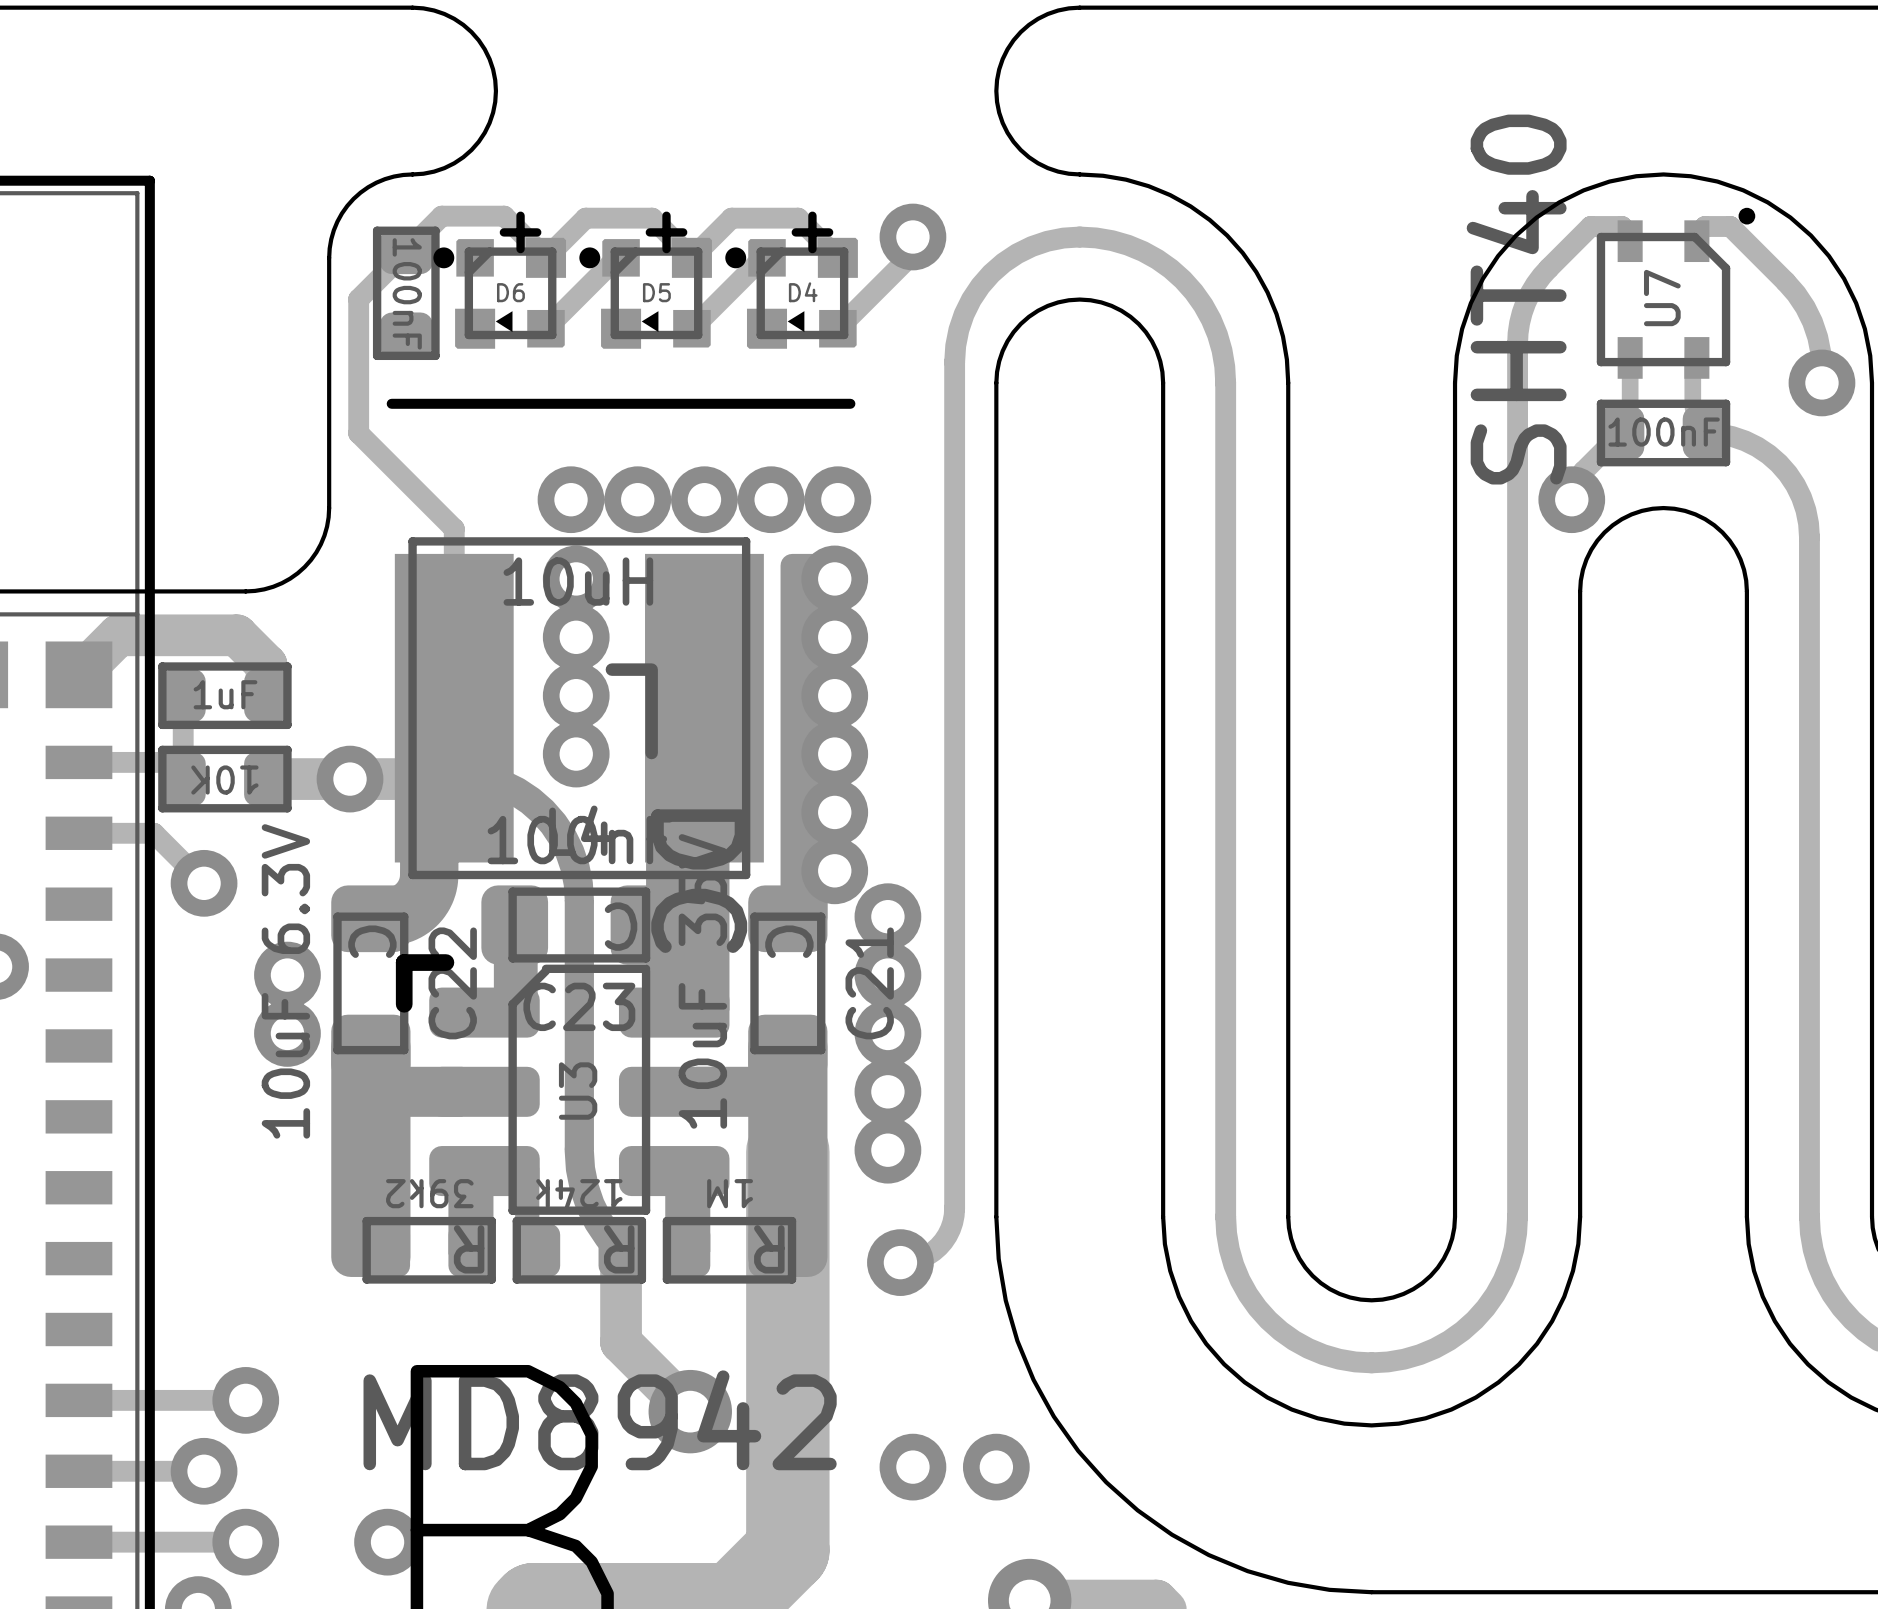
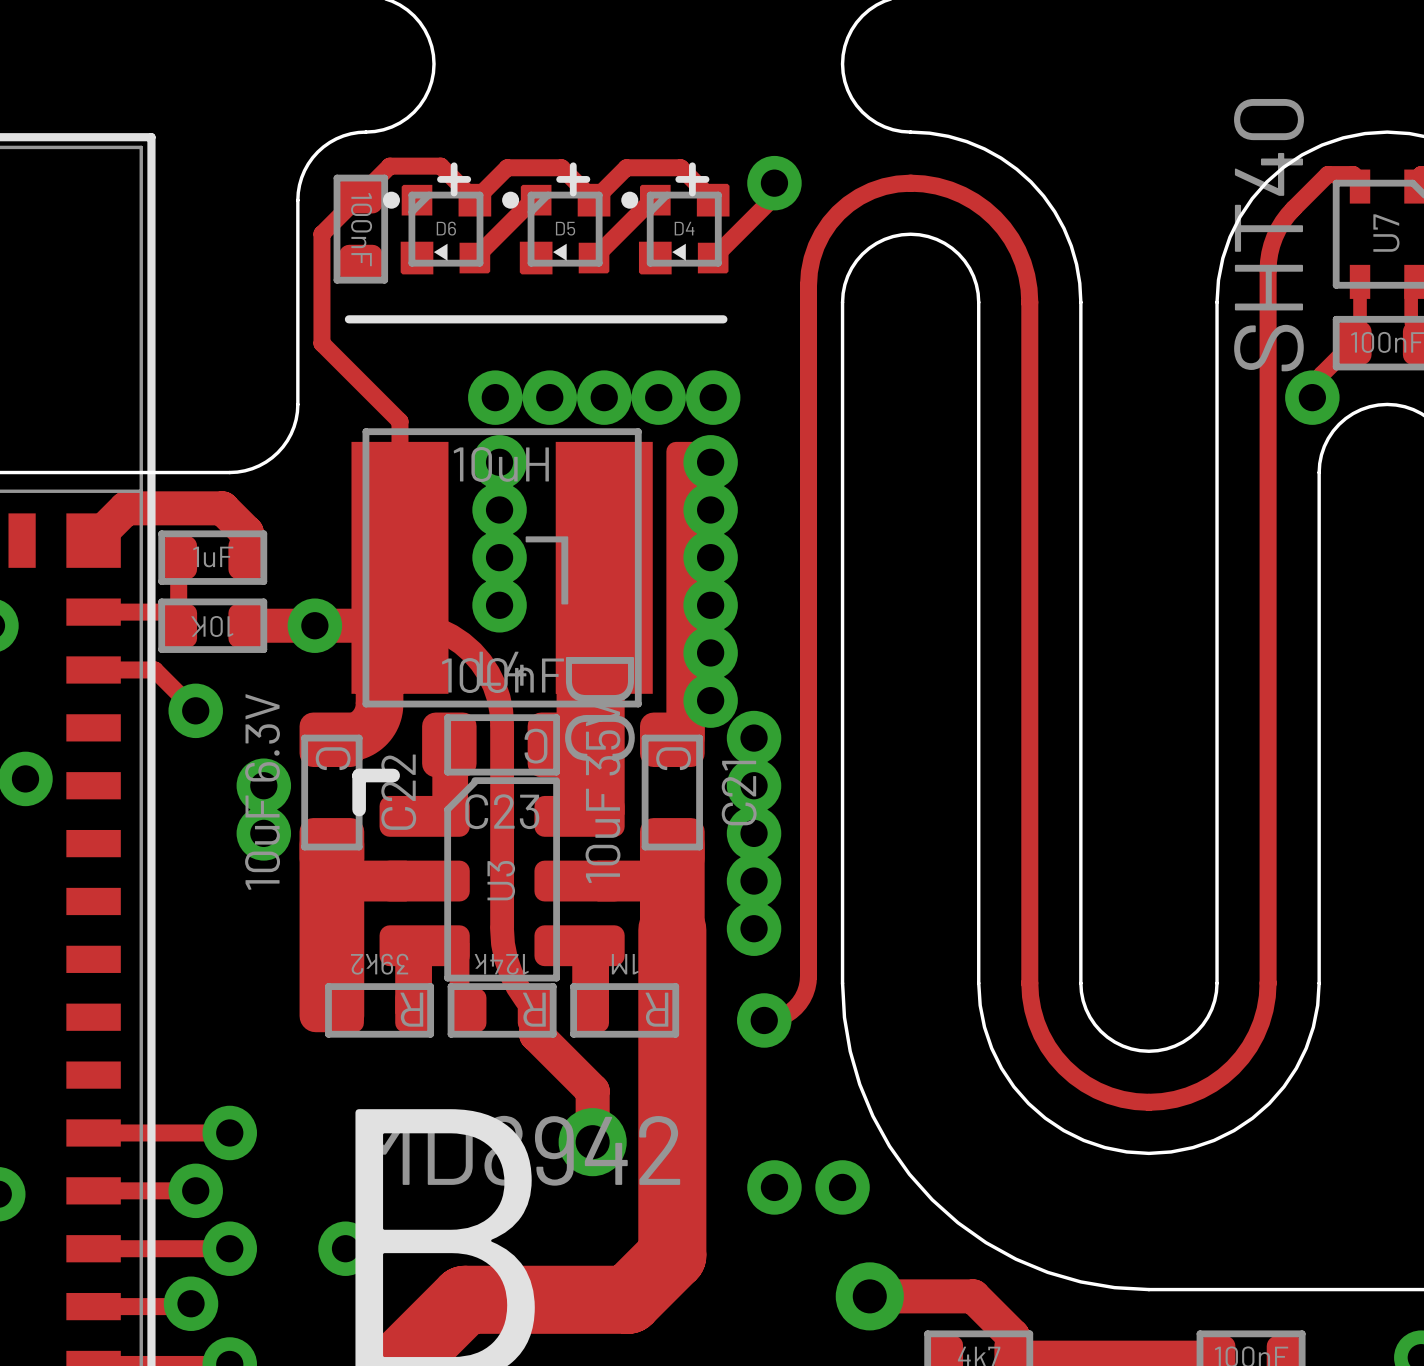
track: (621, 1279) (621, 1342) (690, 1411) -> (536, 1034) (592, 1090) (592, 1142)

